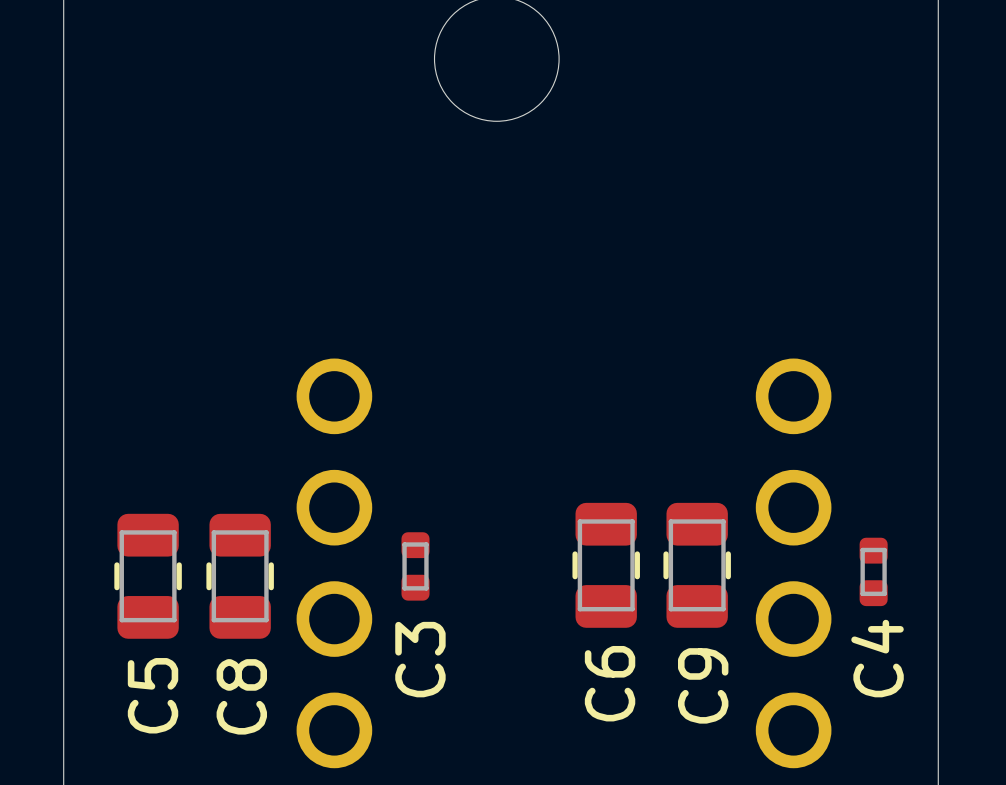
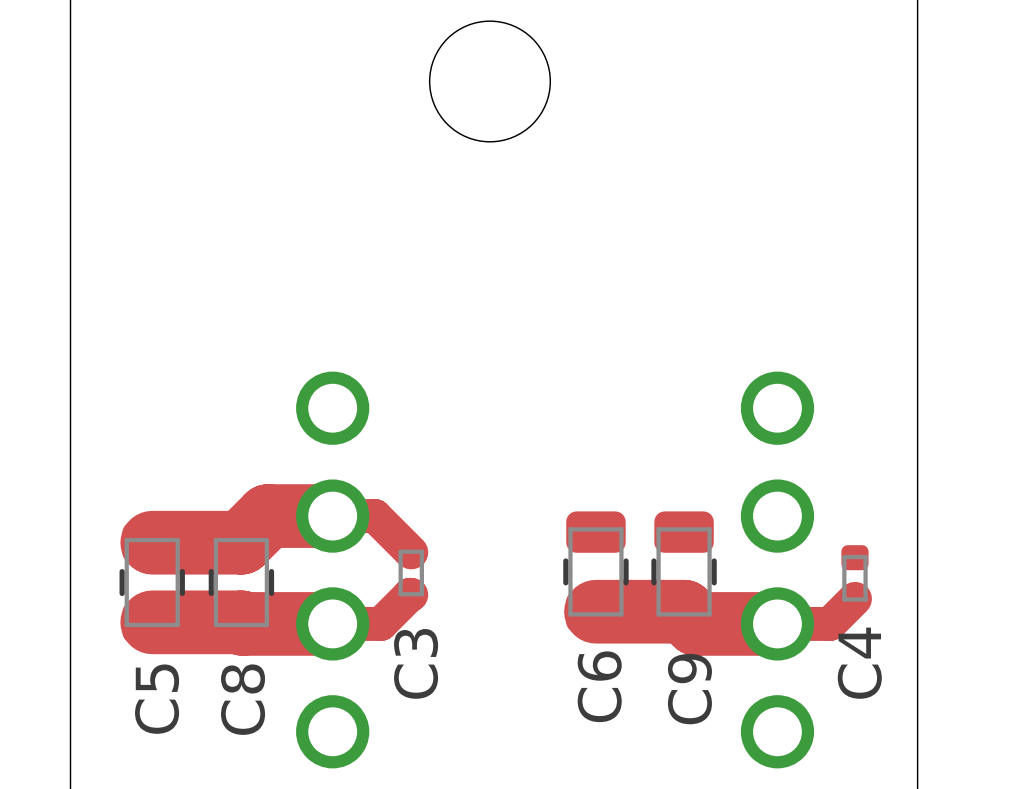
top track: none -> (152, 542) (241, 542) (268, 516) (374, 516) (411, 552)
top track: none -> (411, 594) (380, 623) (152, 622)
top track: none -> (854, 598) (829, 623) (696, 623) (684, 611) (595, 611)

